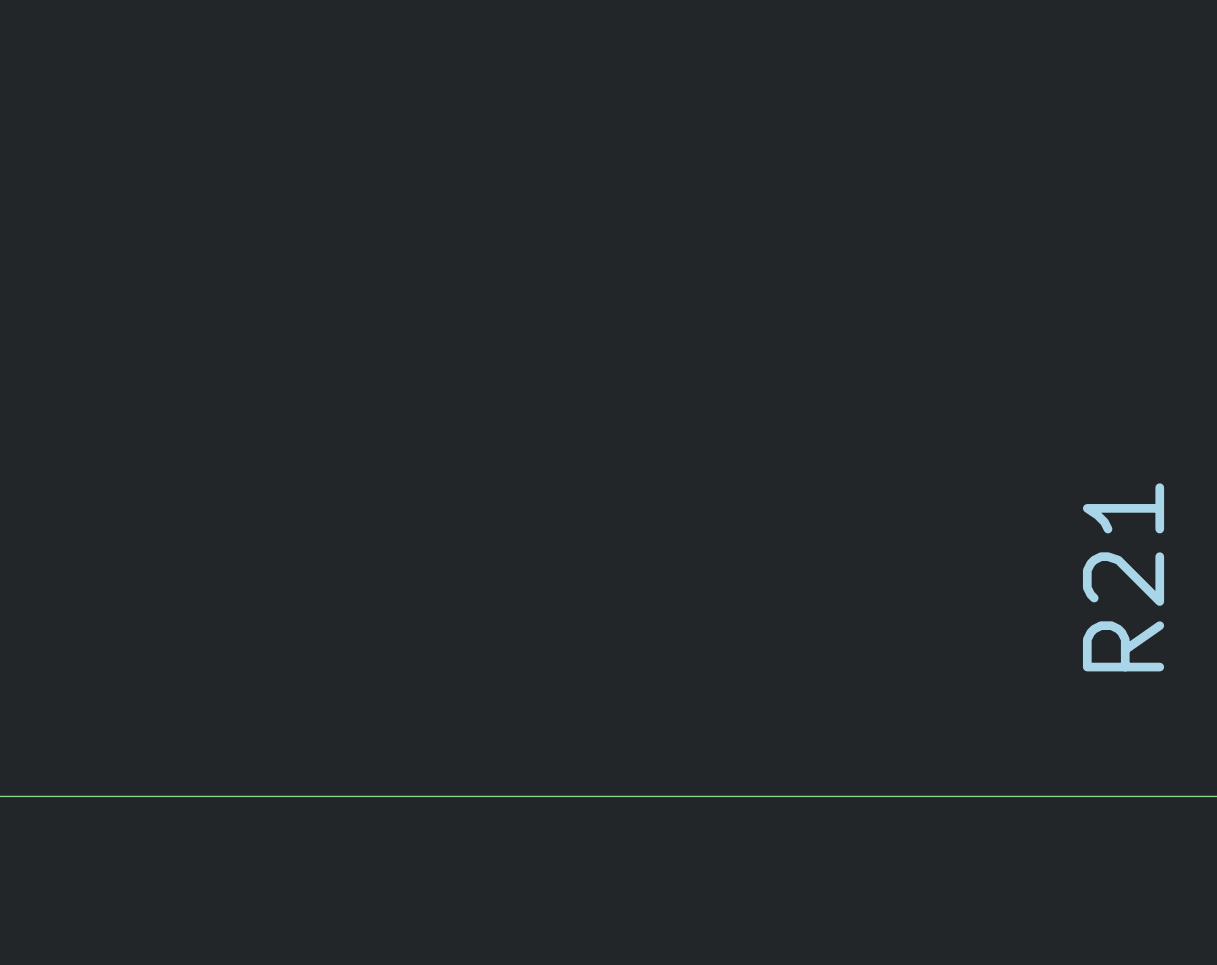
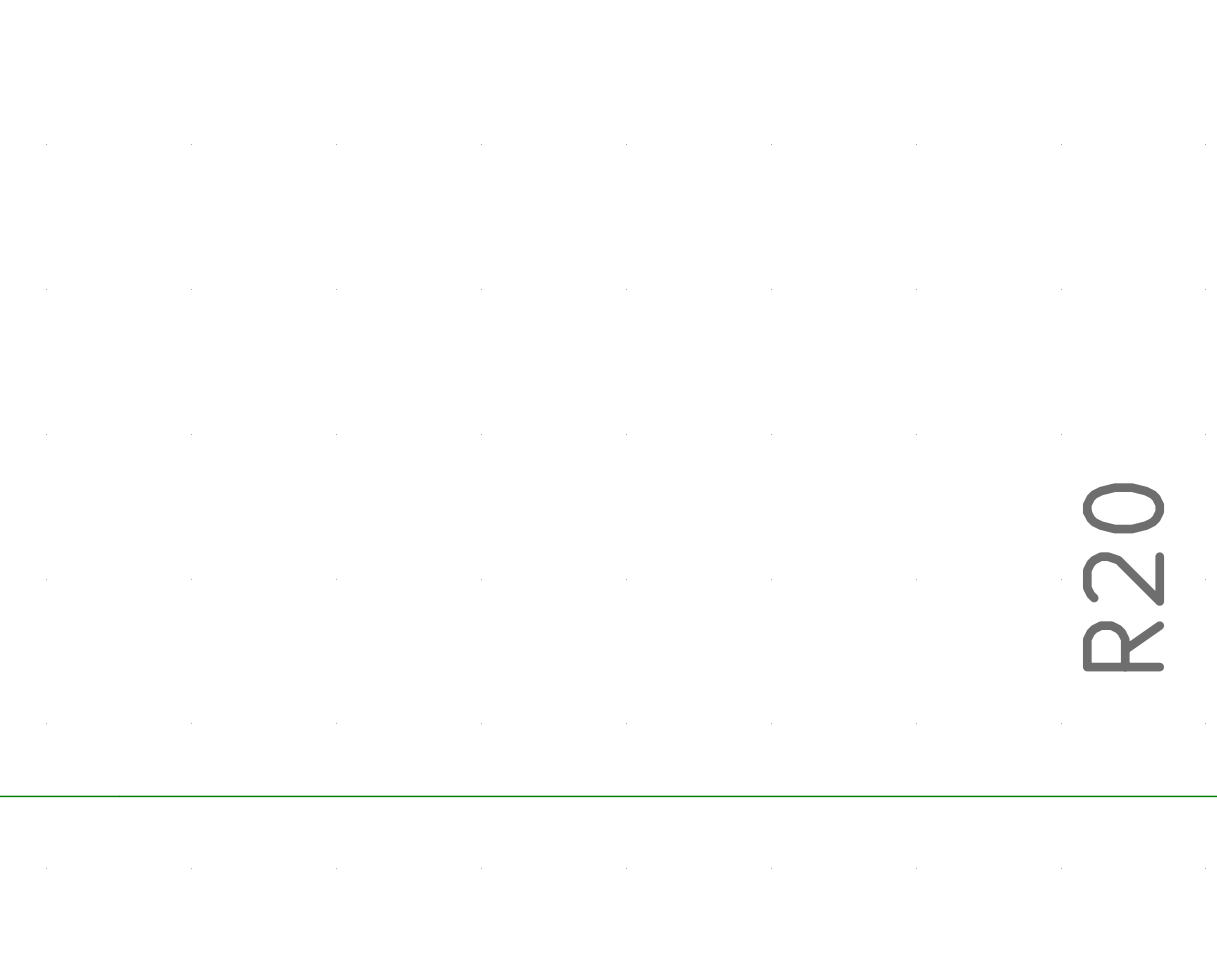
R21 name: R21 (1123, 577) -> R20 (1123, 577)

